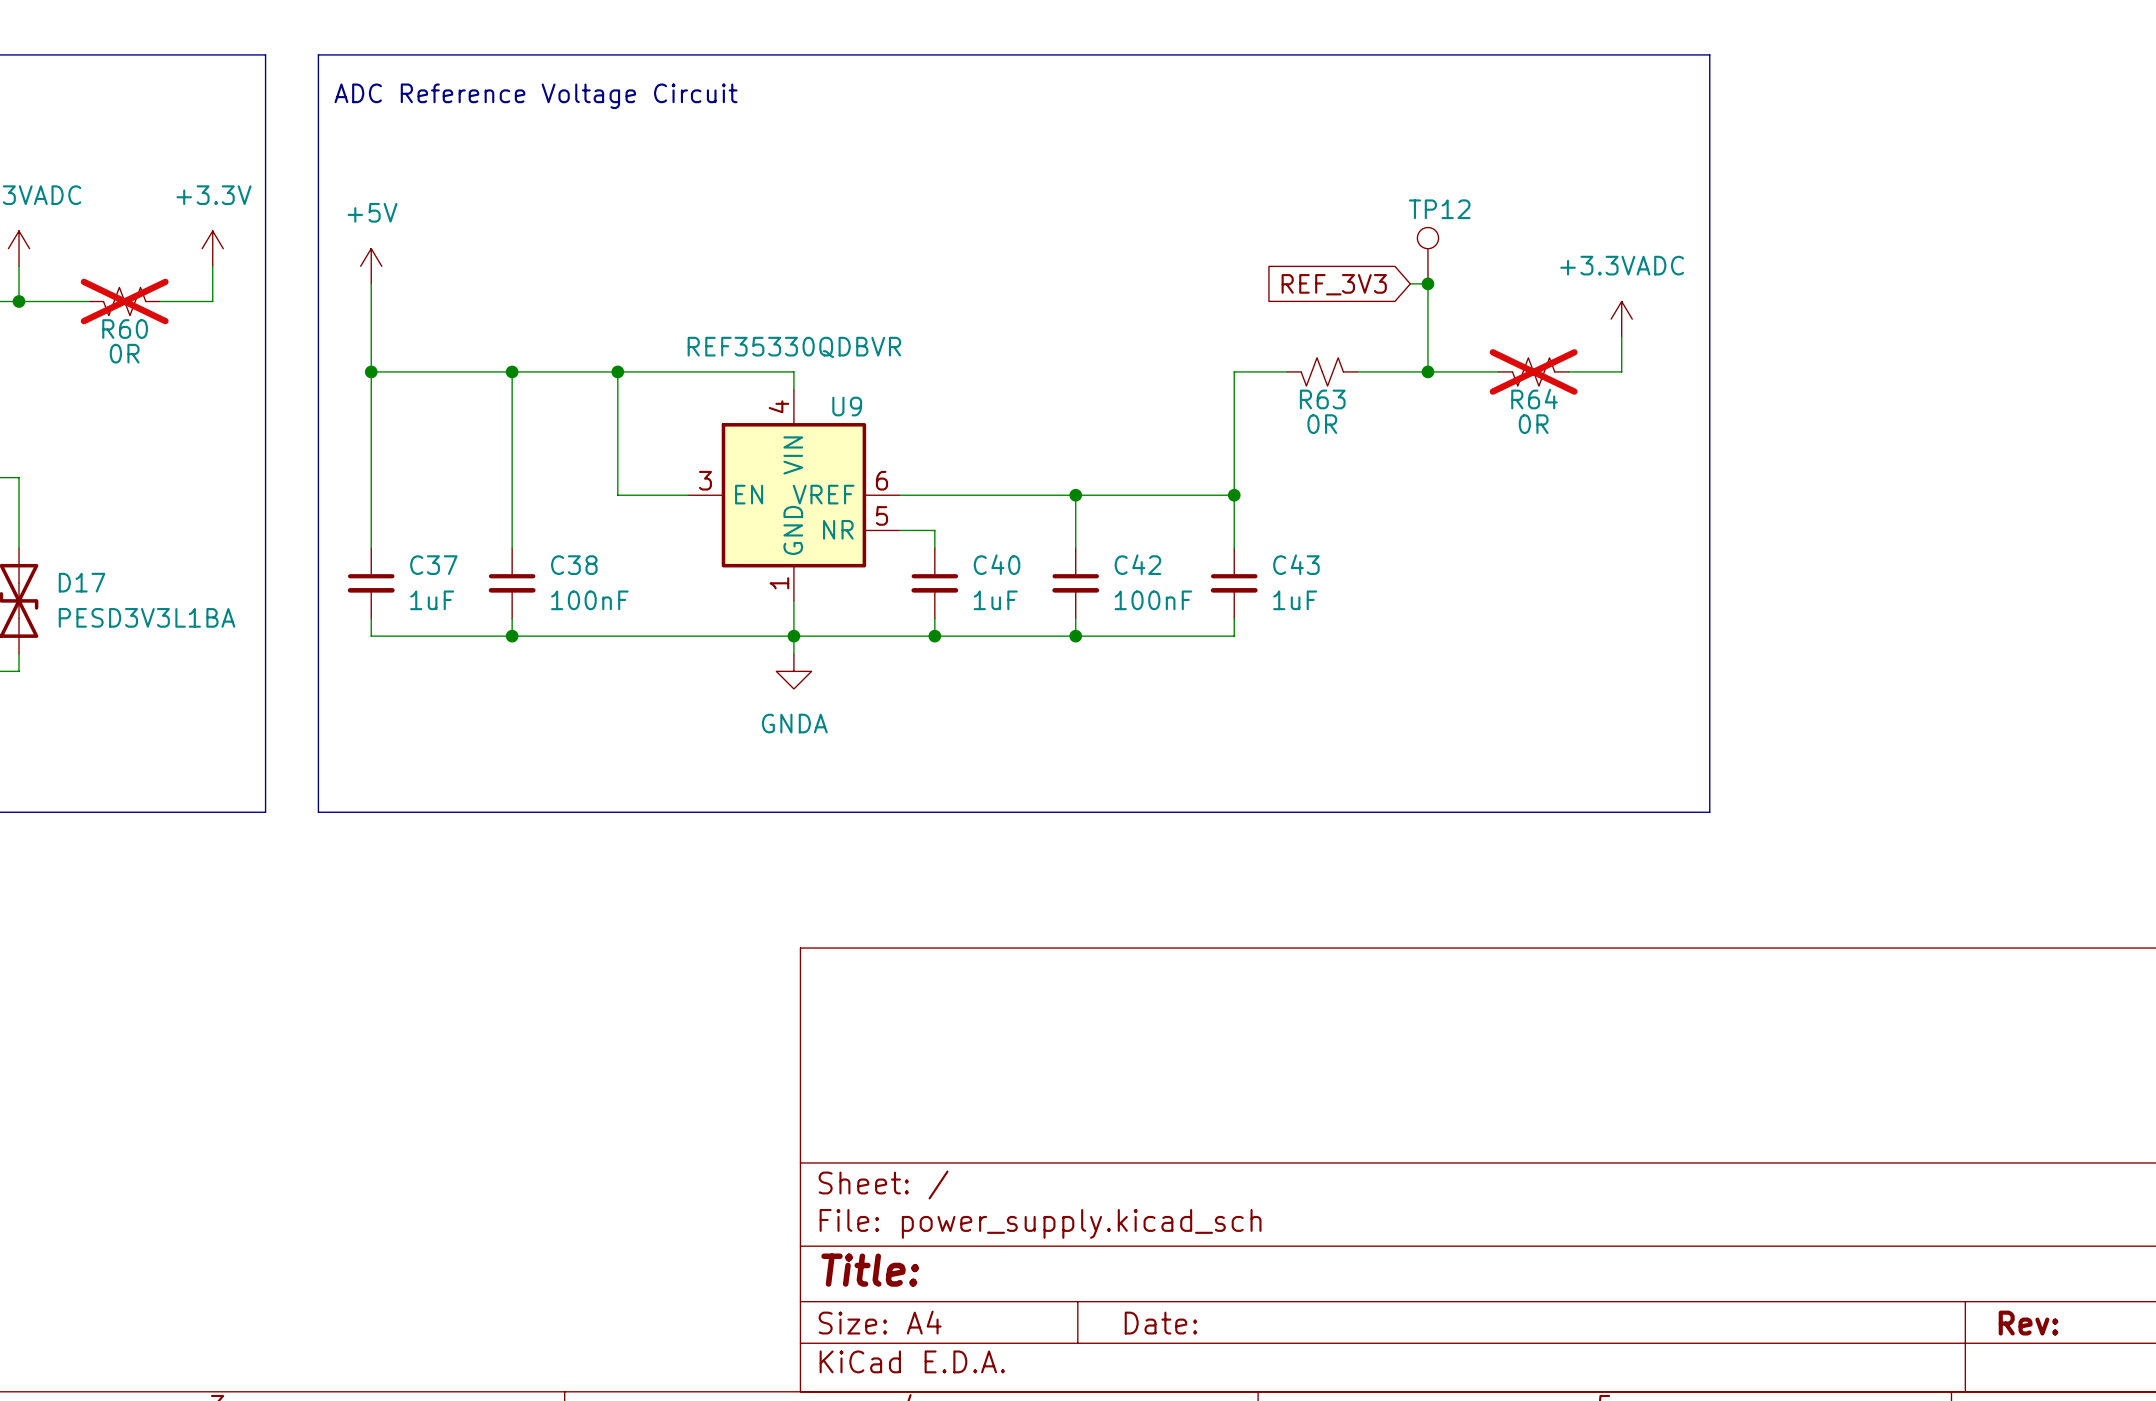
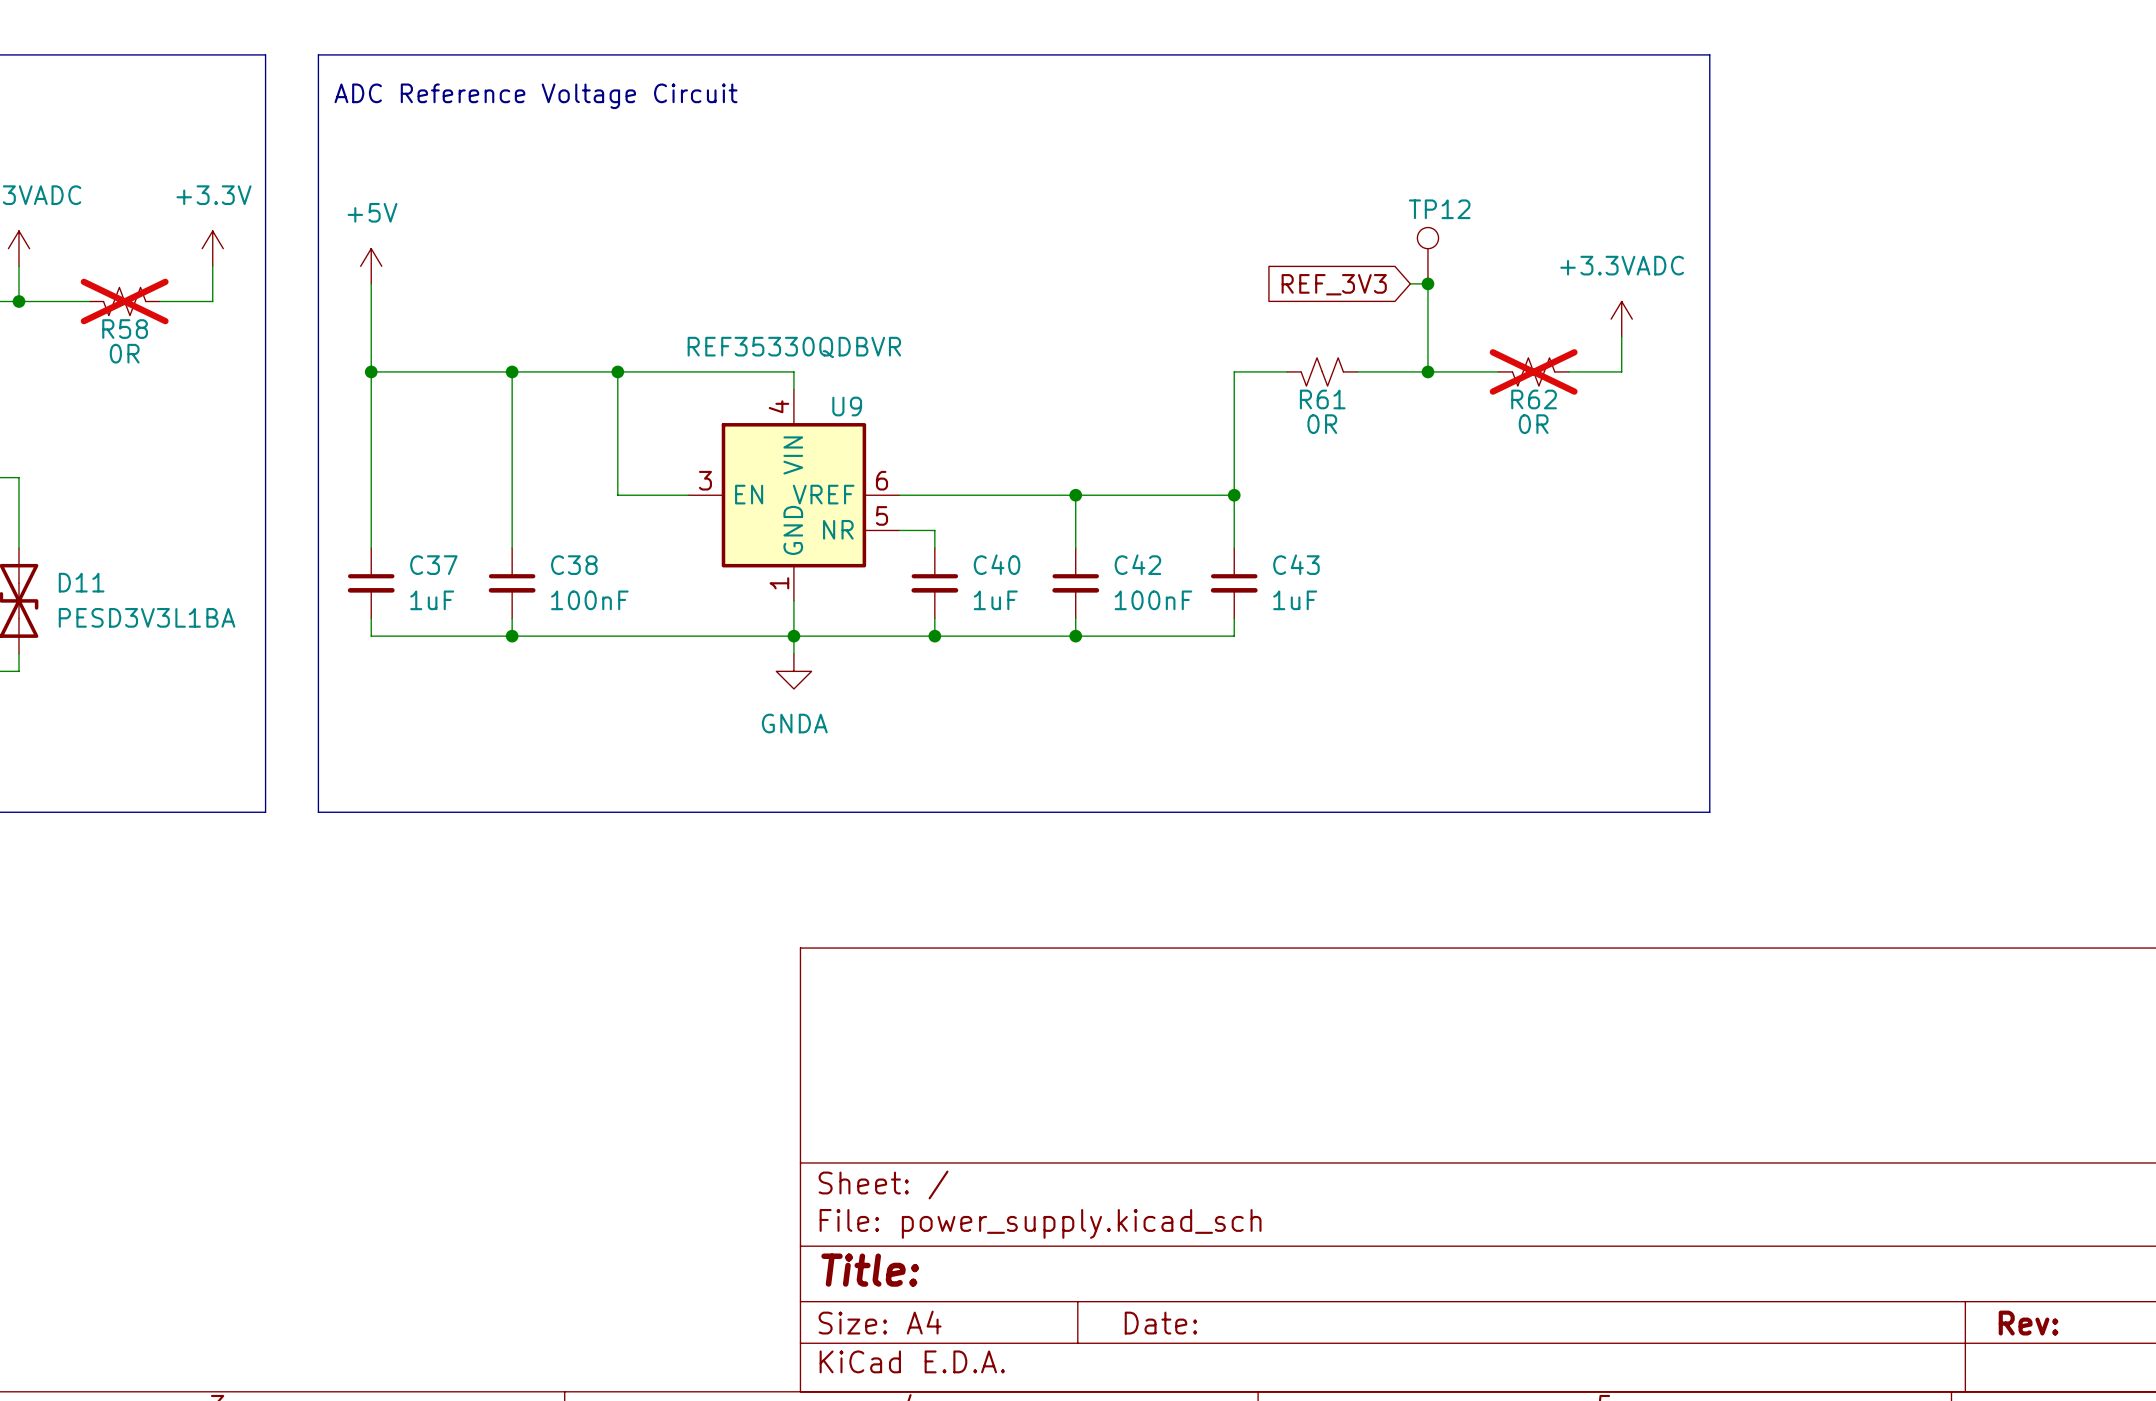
R60 name: R60 (125, 329) -> R58 (125, 329)
R63 name: R63 (1322, 399) -> R61 (1322, 399)
R64 name: R64 (1534, 399) -> R62 (1534, 399)
D17 name: D17 (82, 582) -> D11 (81, 582)

